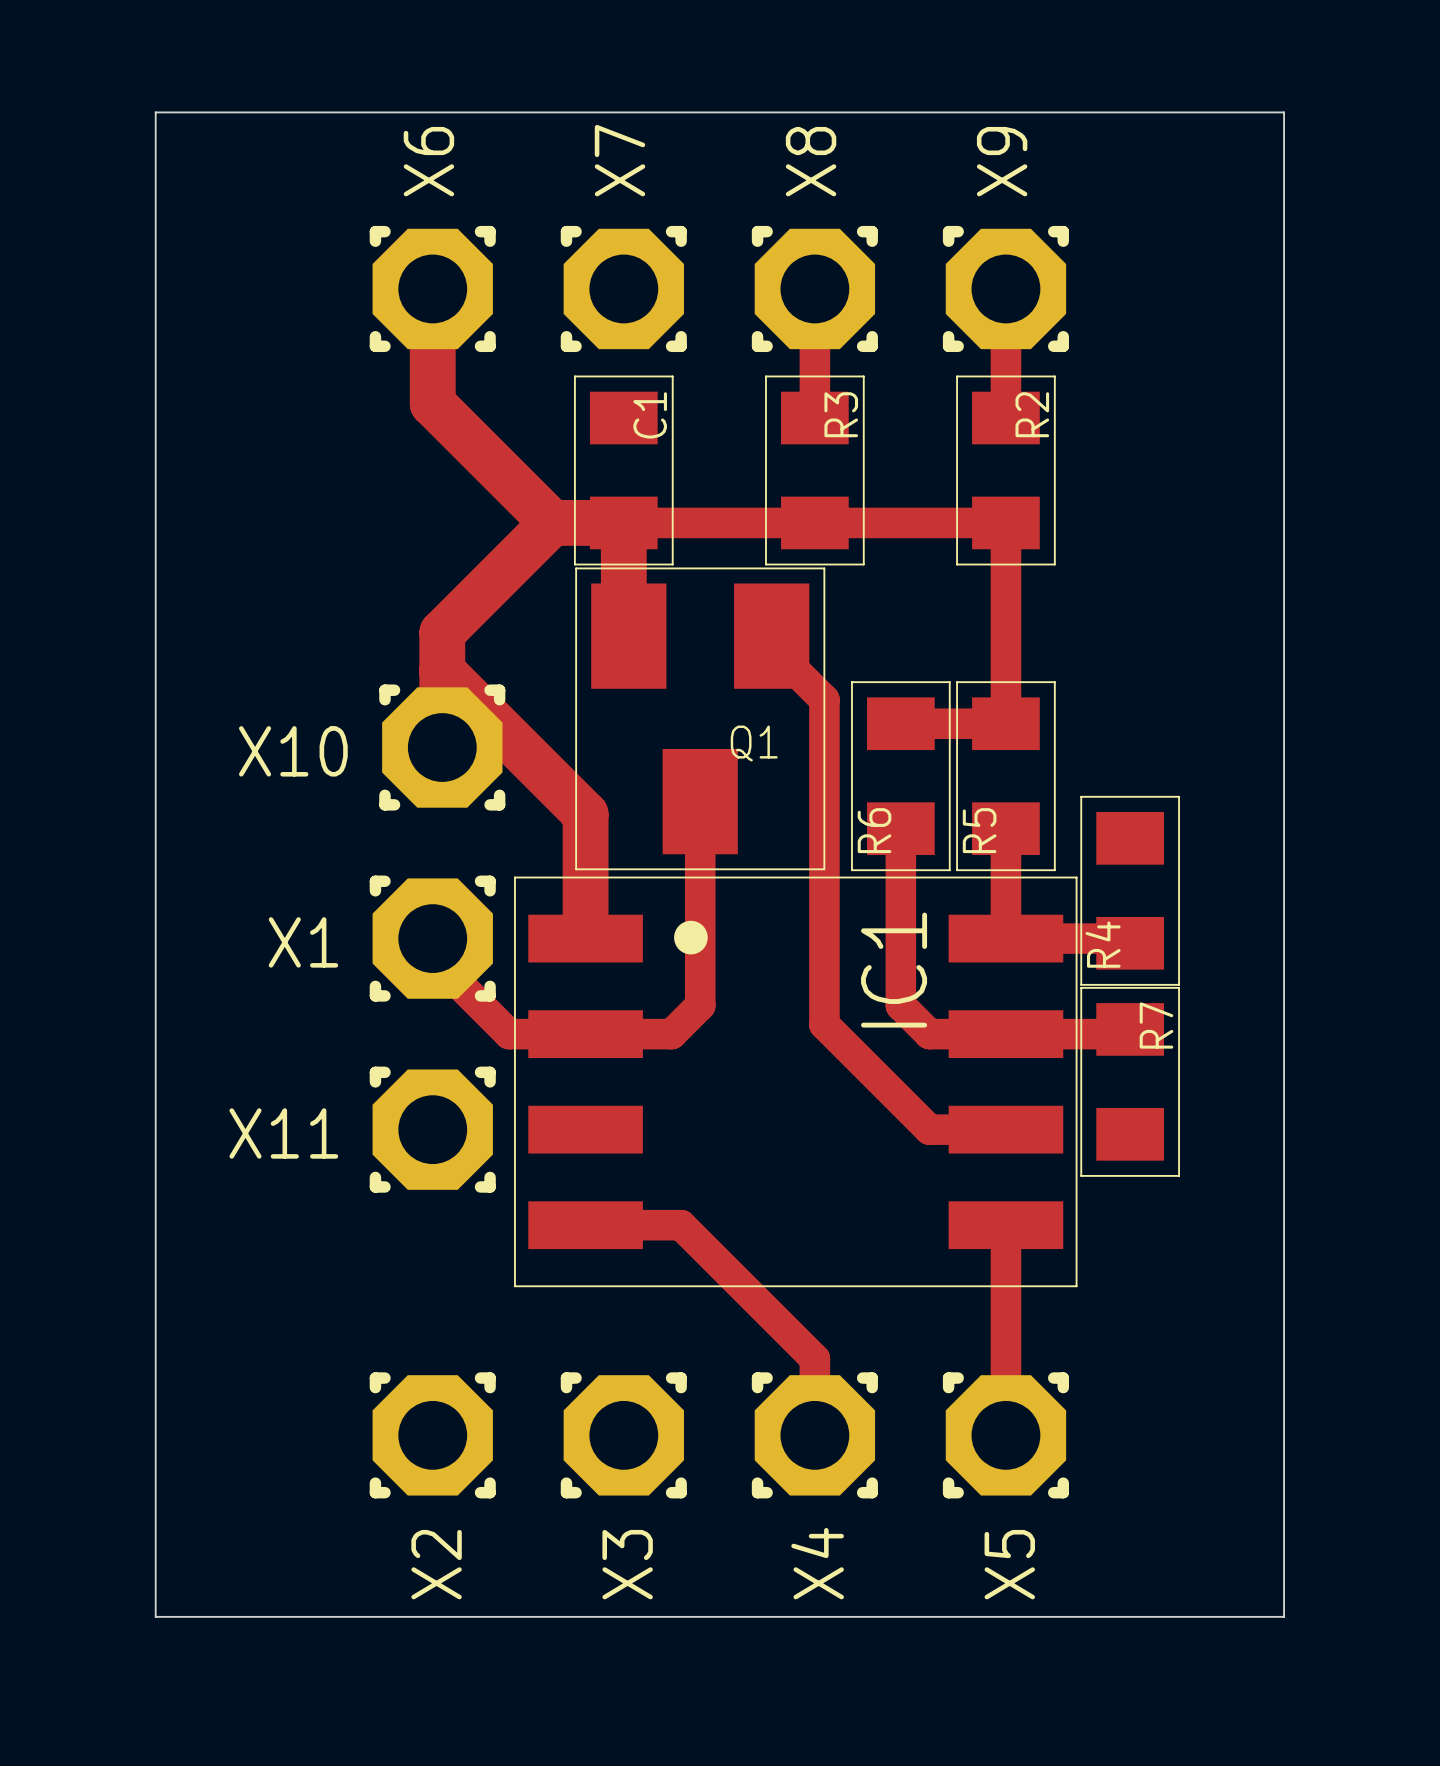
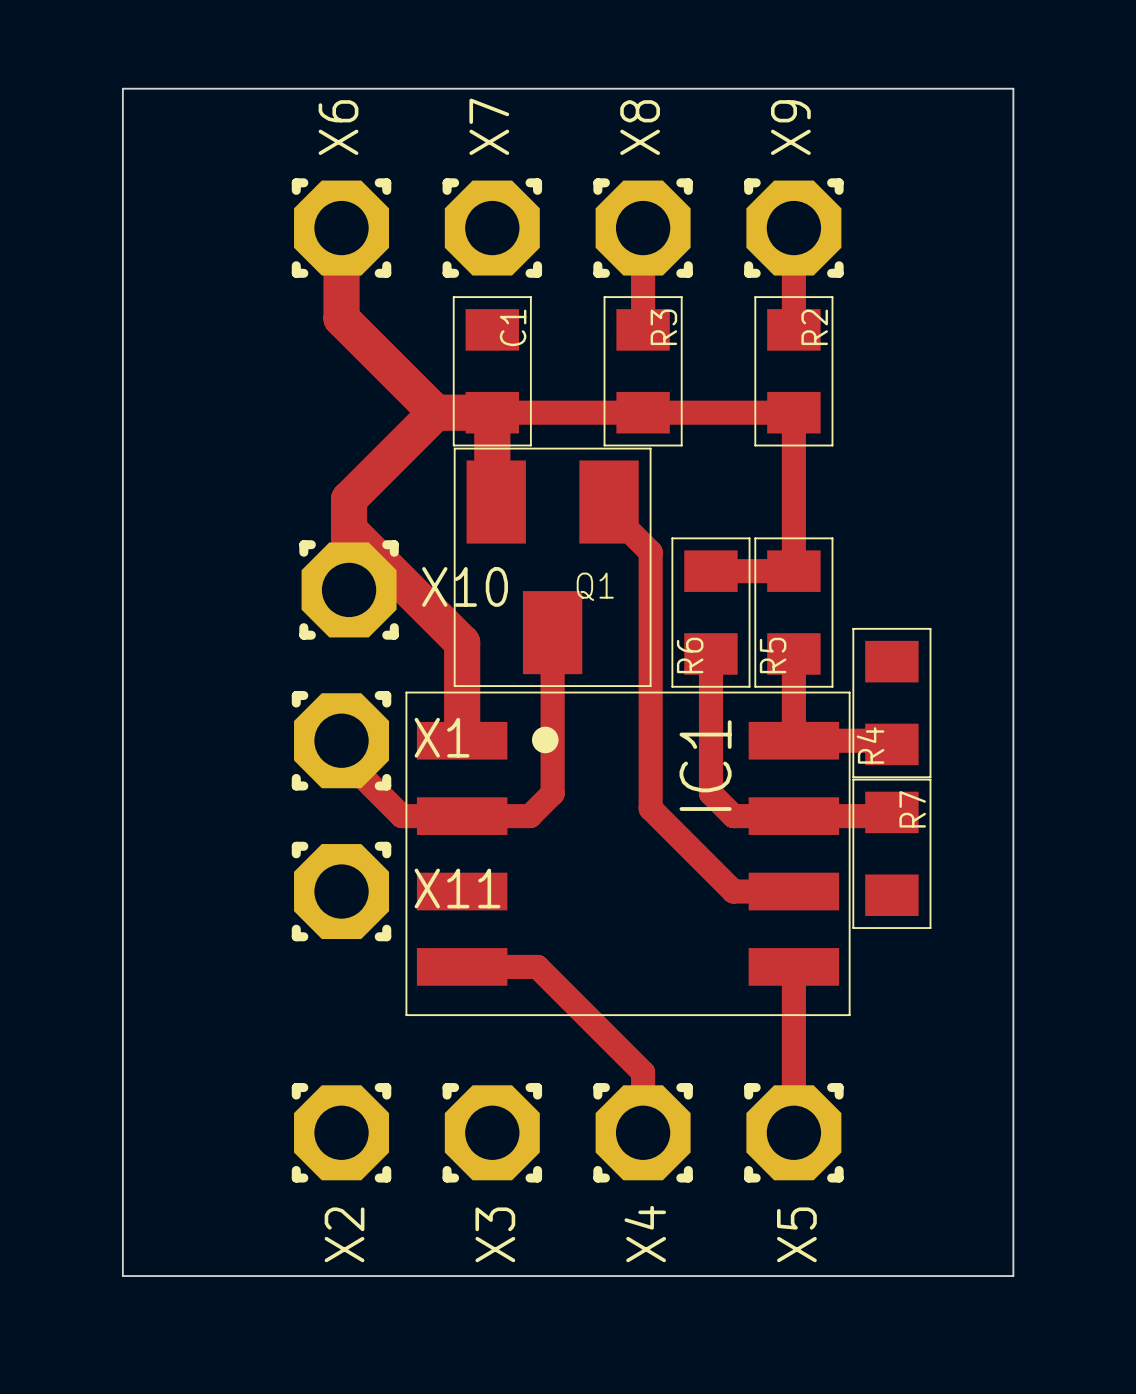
X10 name position: X10 (293, 751) -> X10 (465, 586)
X1 name position: X1 (303, 942) -> X1 (442, 737)
X11 name position: X11 (283, 1133) -> X11 (457, 888)

